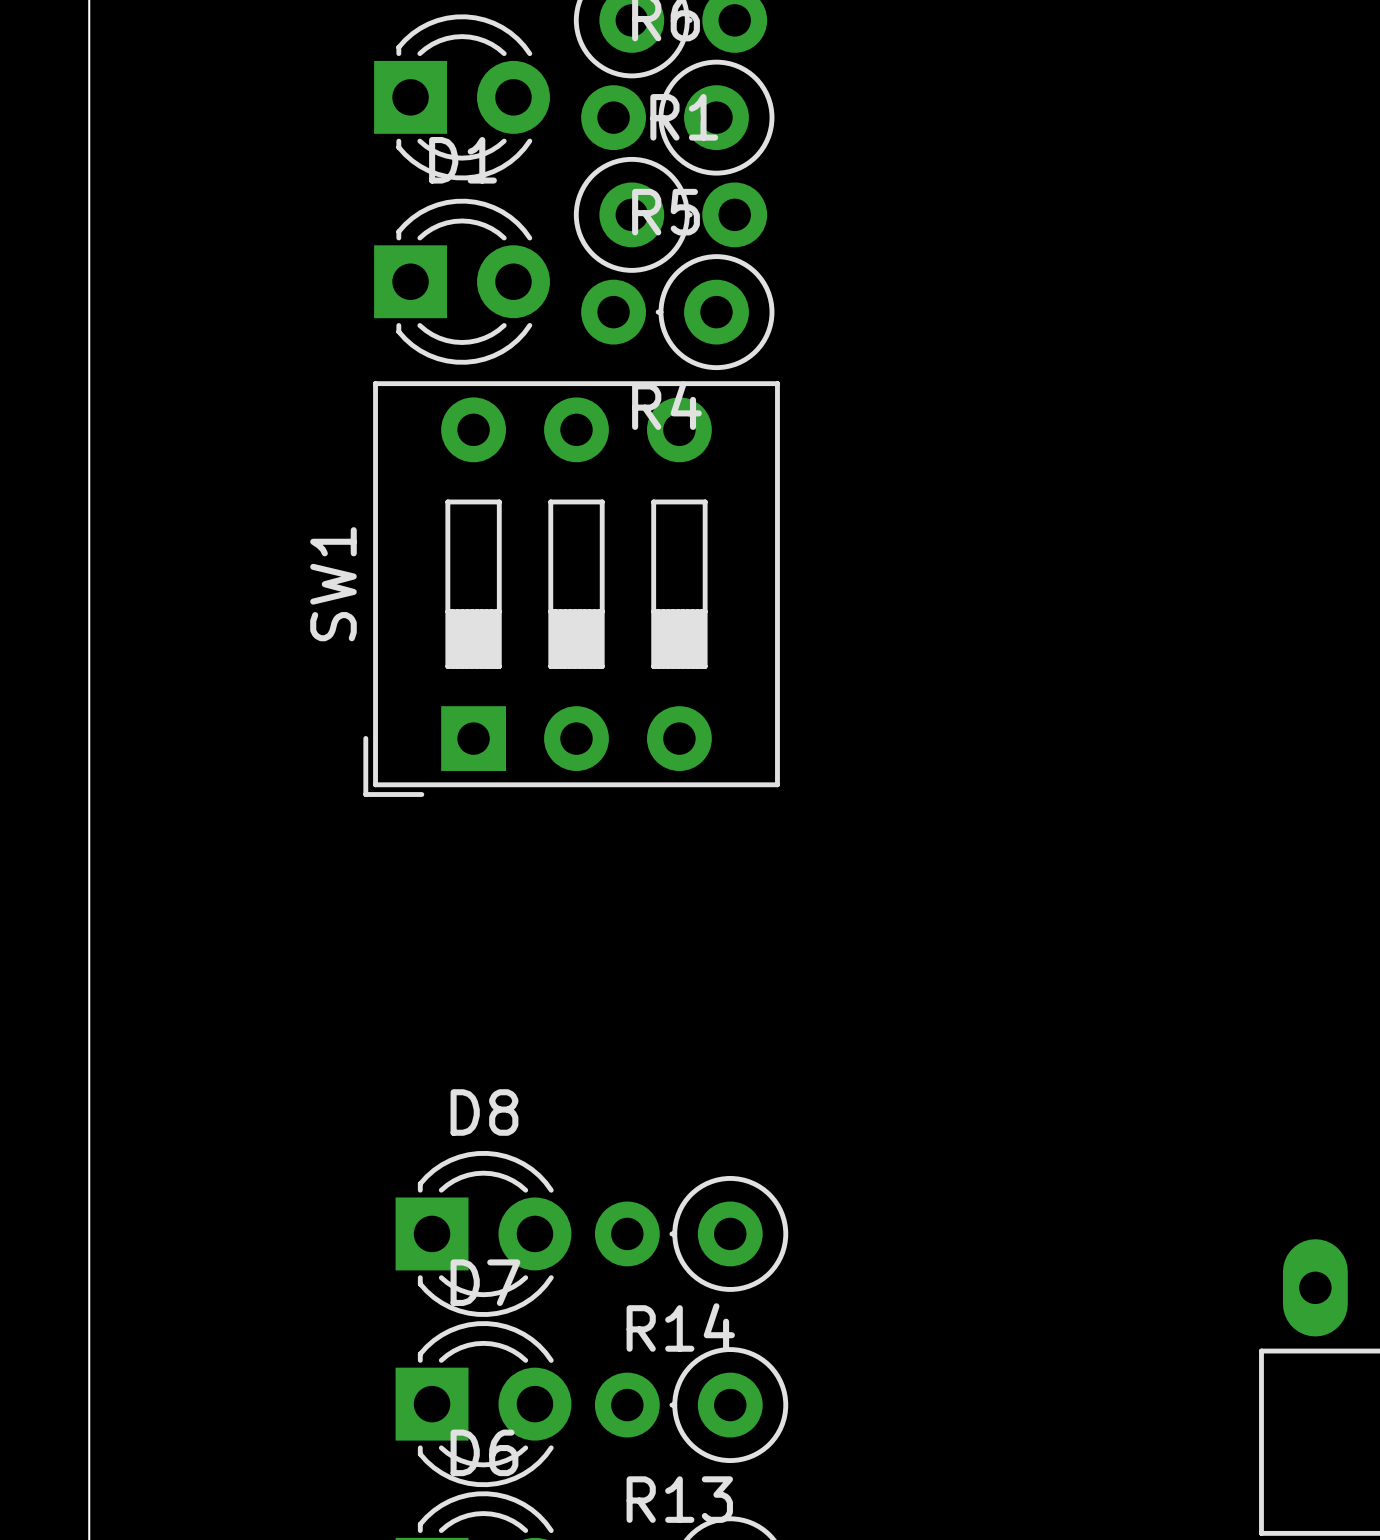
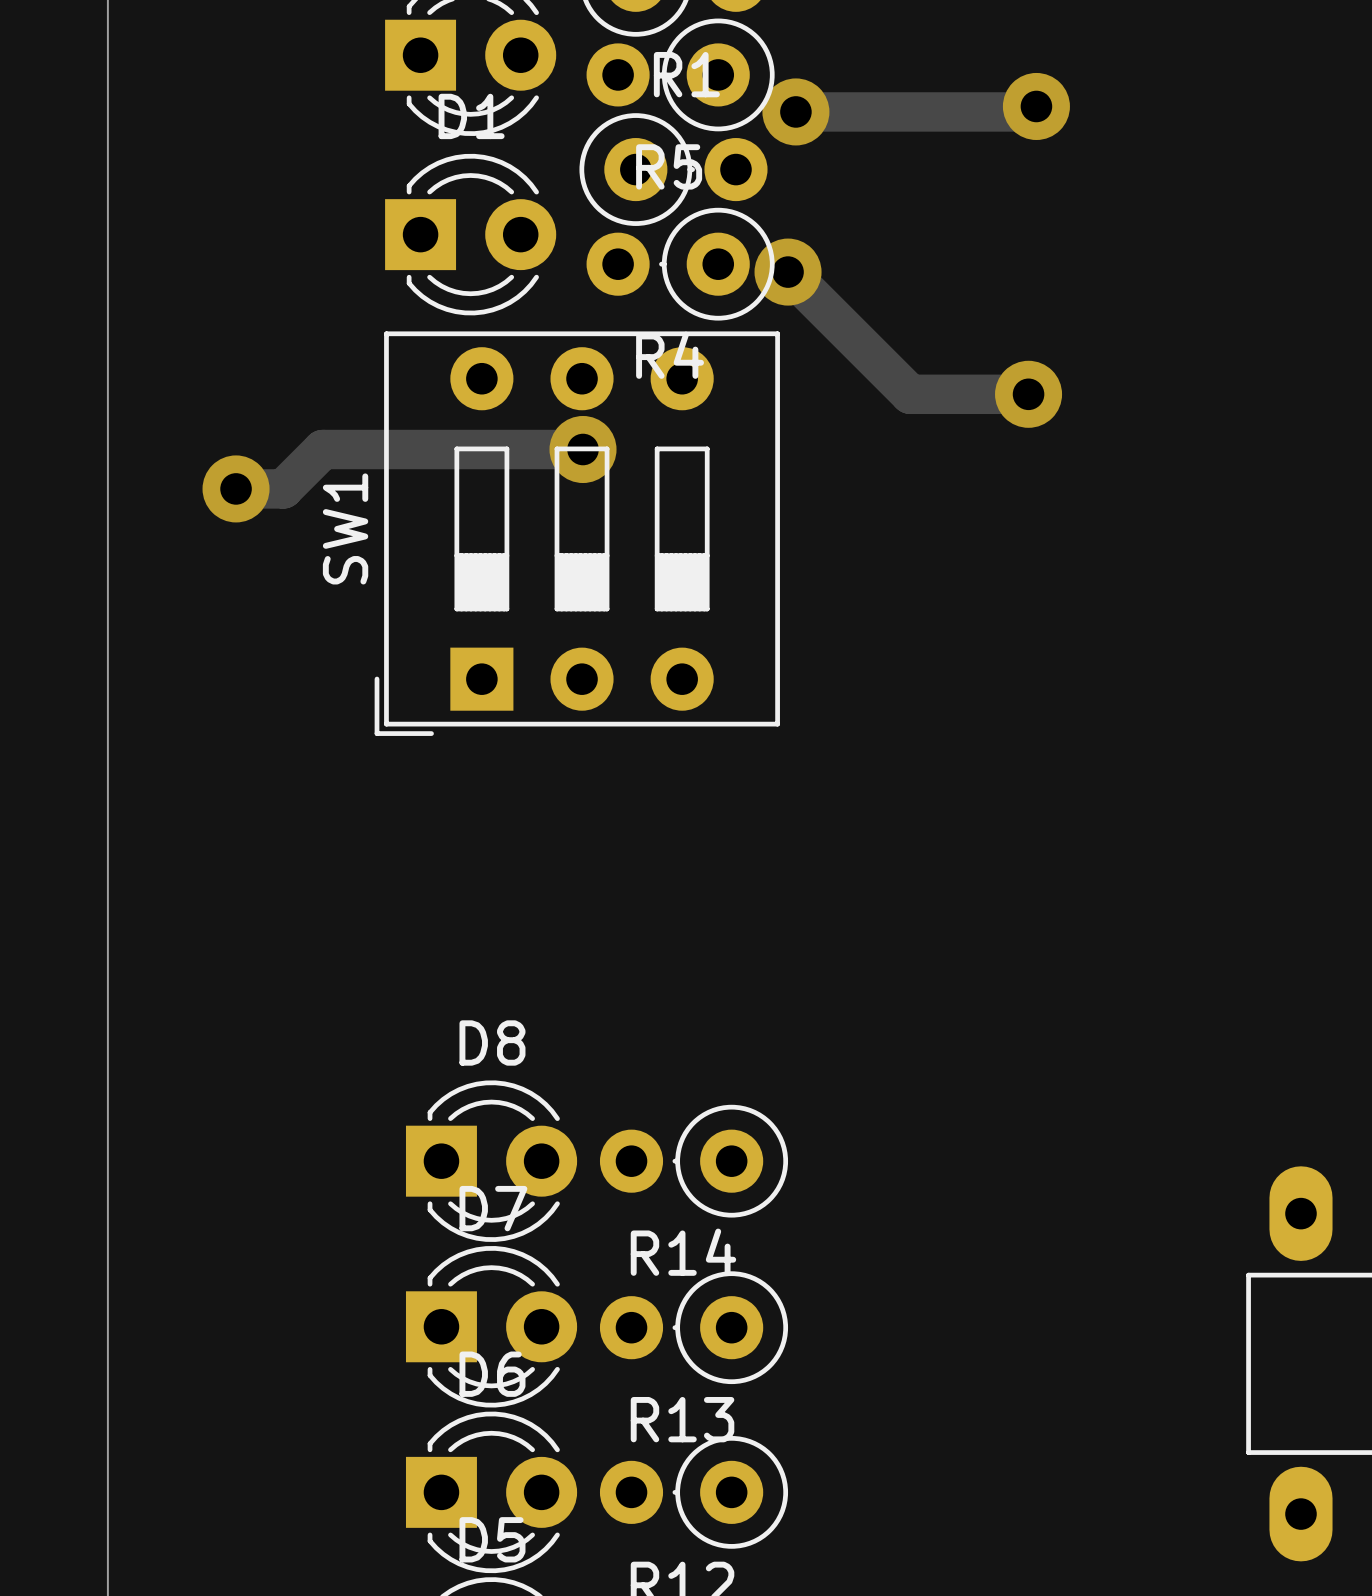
track: none -> (1036, 106) (1030, 111) (795, 111)
via: none -> (1036, 106)
via: none -> (795, 111)
track: none -> (788, 272) (910, 394) (1028, 394)
via: none -> (788, 272)
via: none -> (1028, 394)
track: none -> (583, 449) (322, 449) (283, 488) (236, 488)
via: none -> (583, 449)
via: none -> (236, 488)

